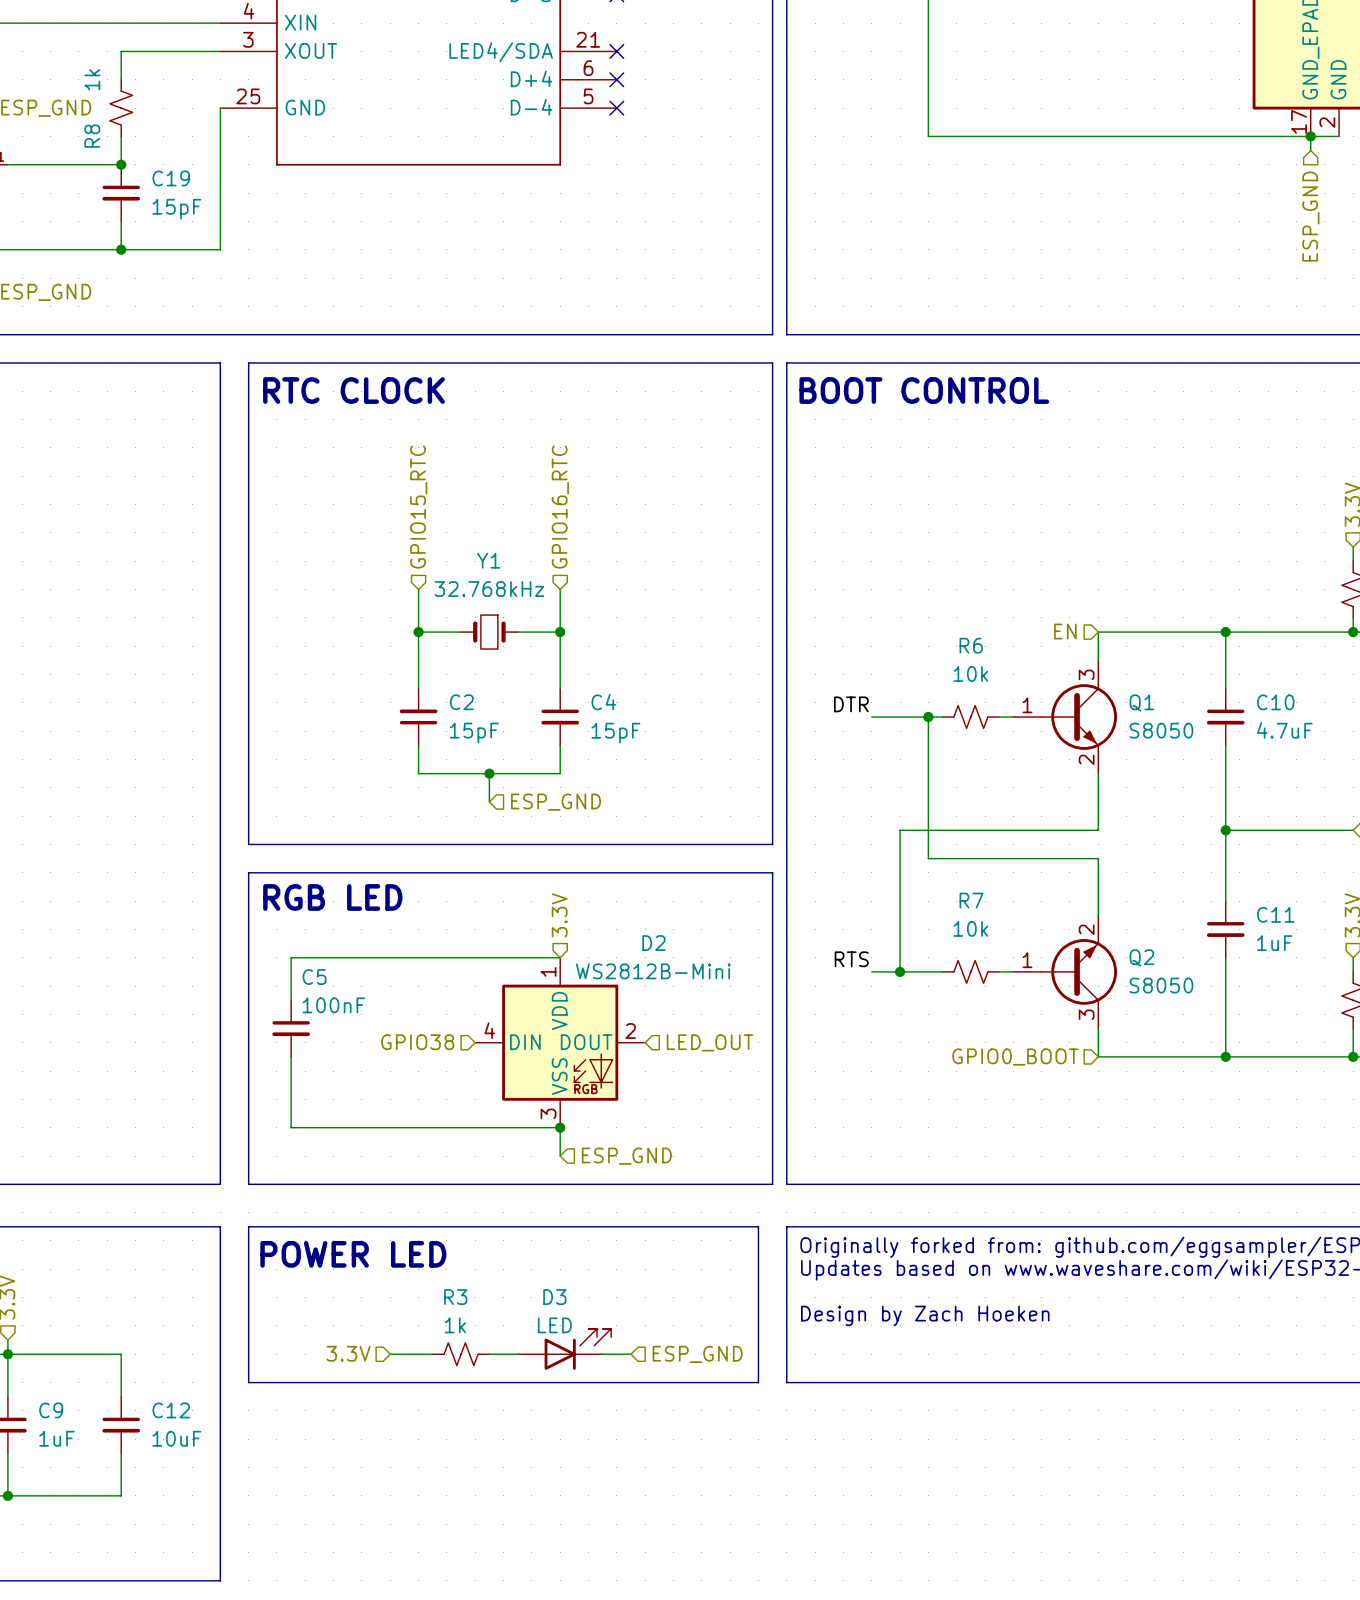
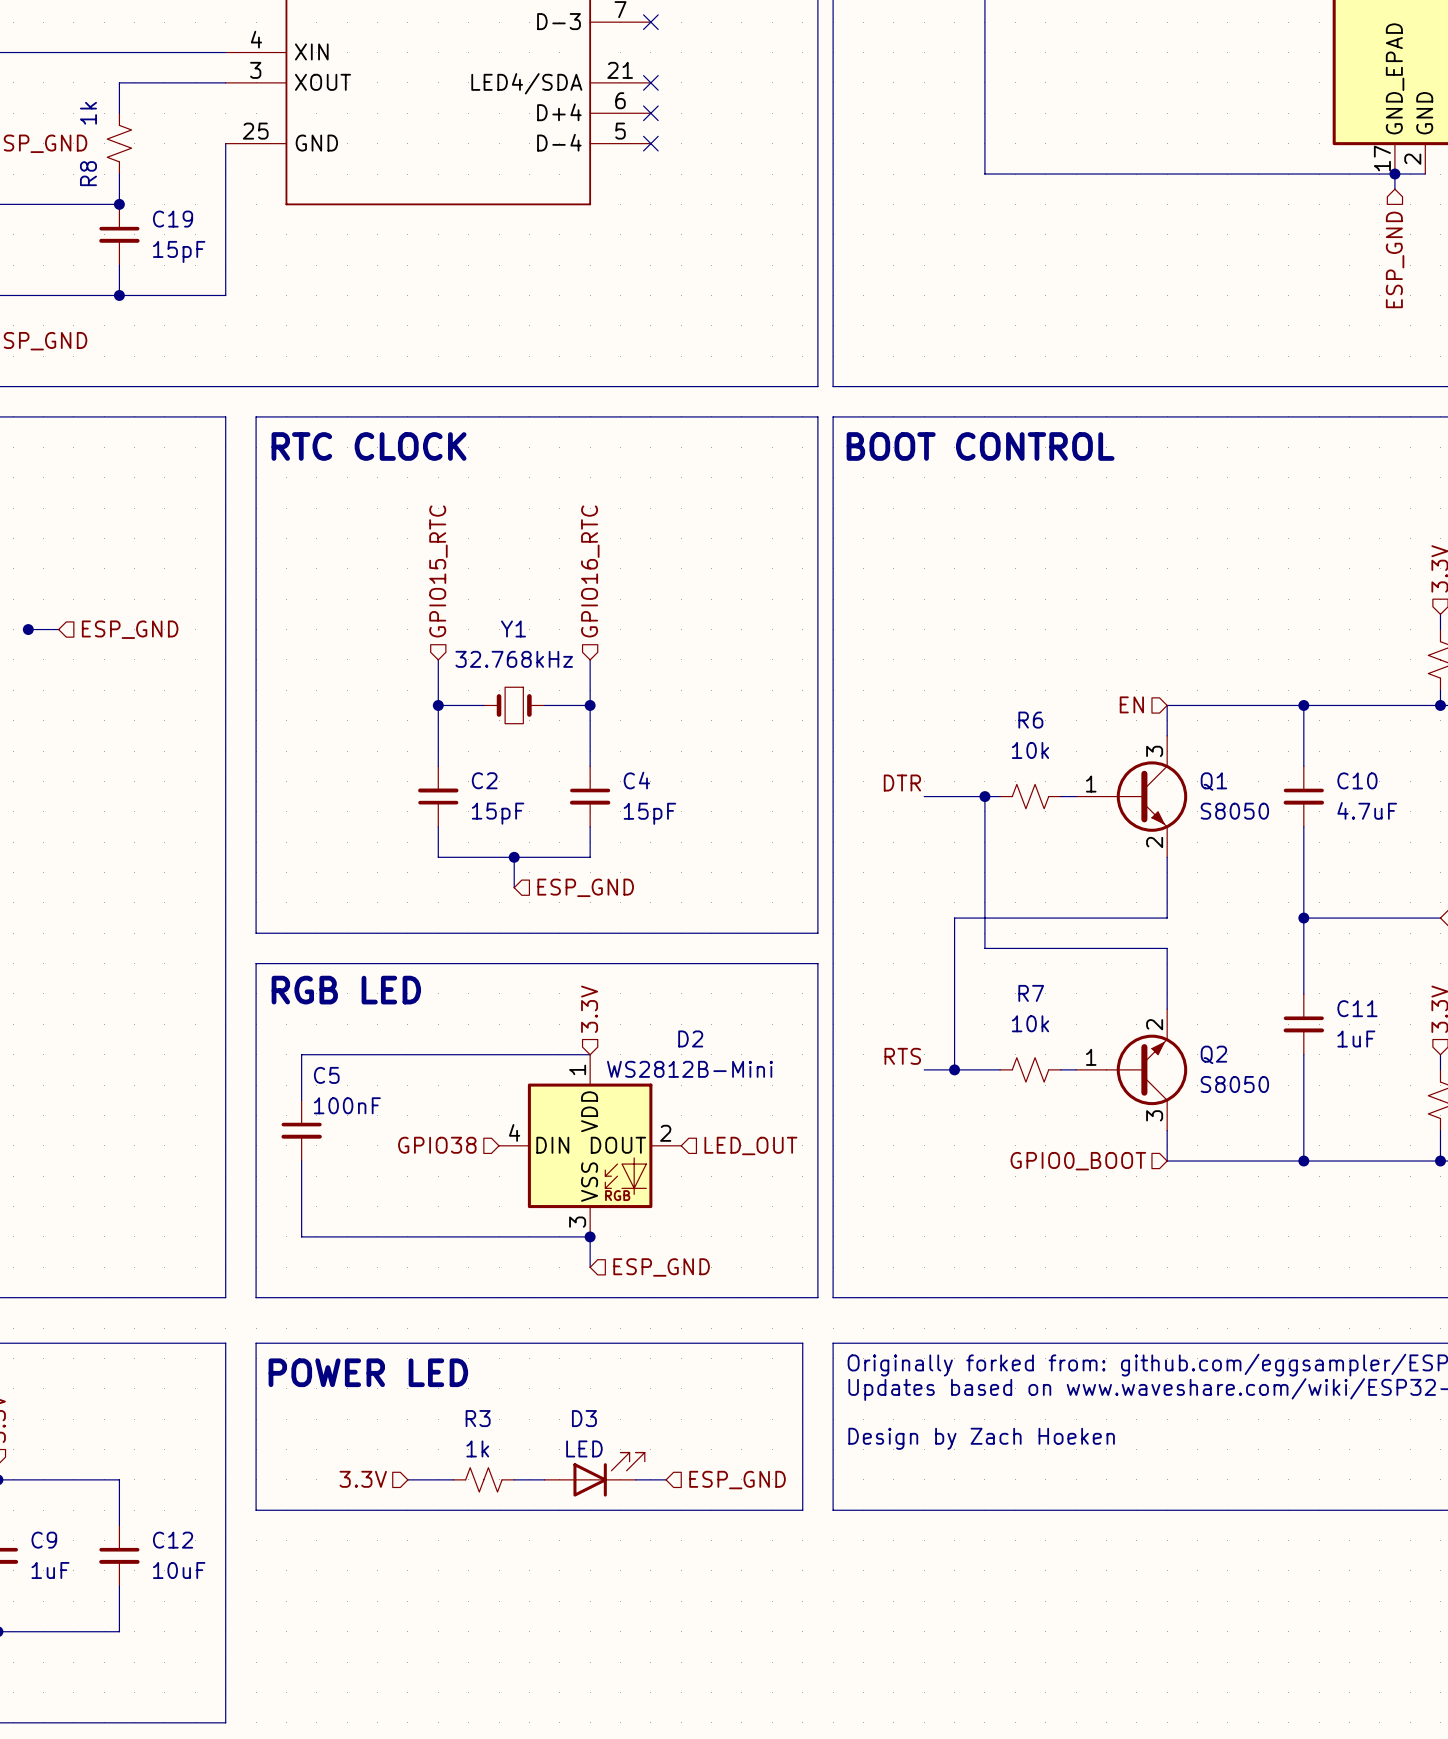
wire: none -> (28, 629) (58, 629)
junction: none -> (28, 629)
hierarchical label: none -> ESP_GND (130, 629)

